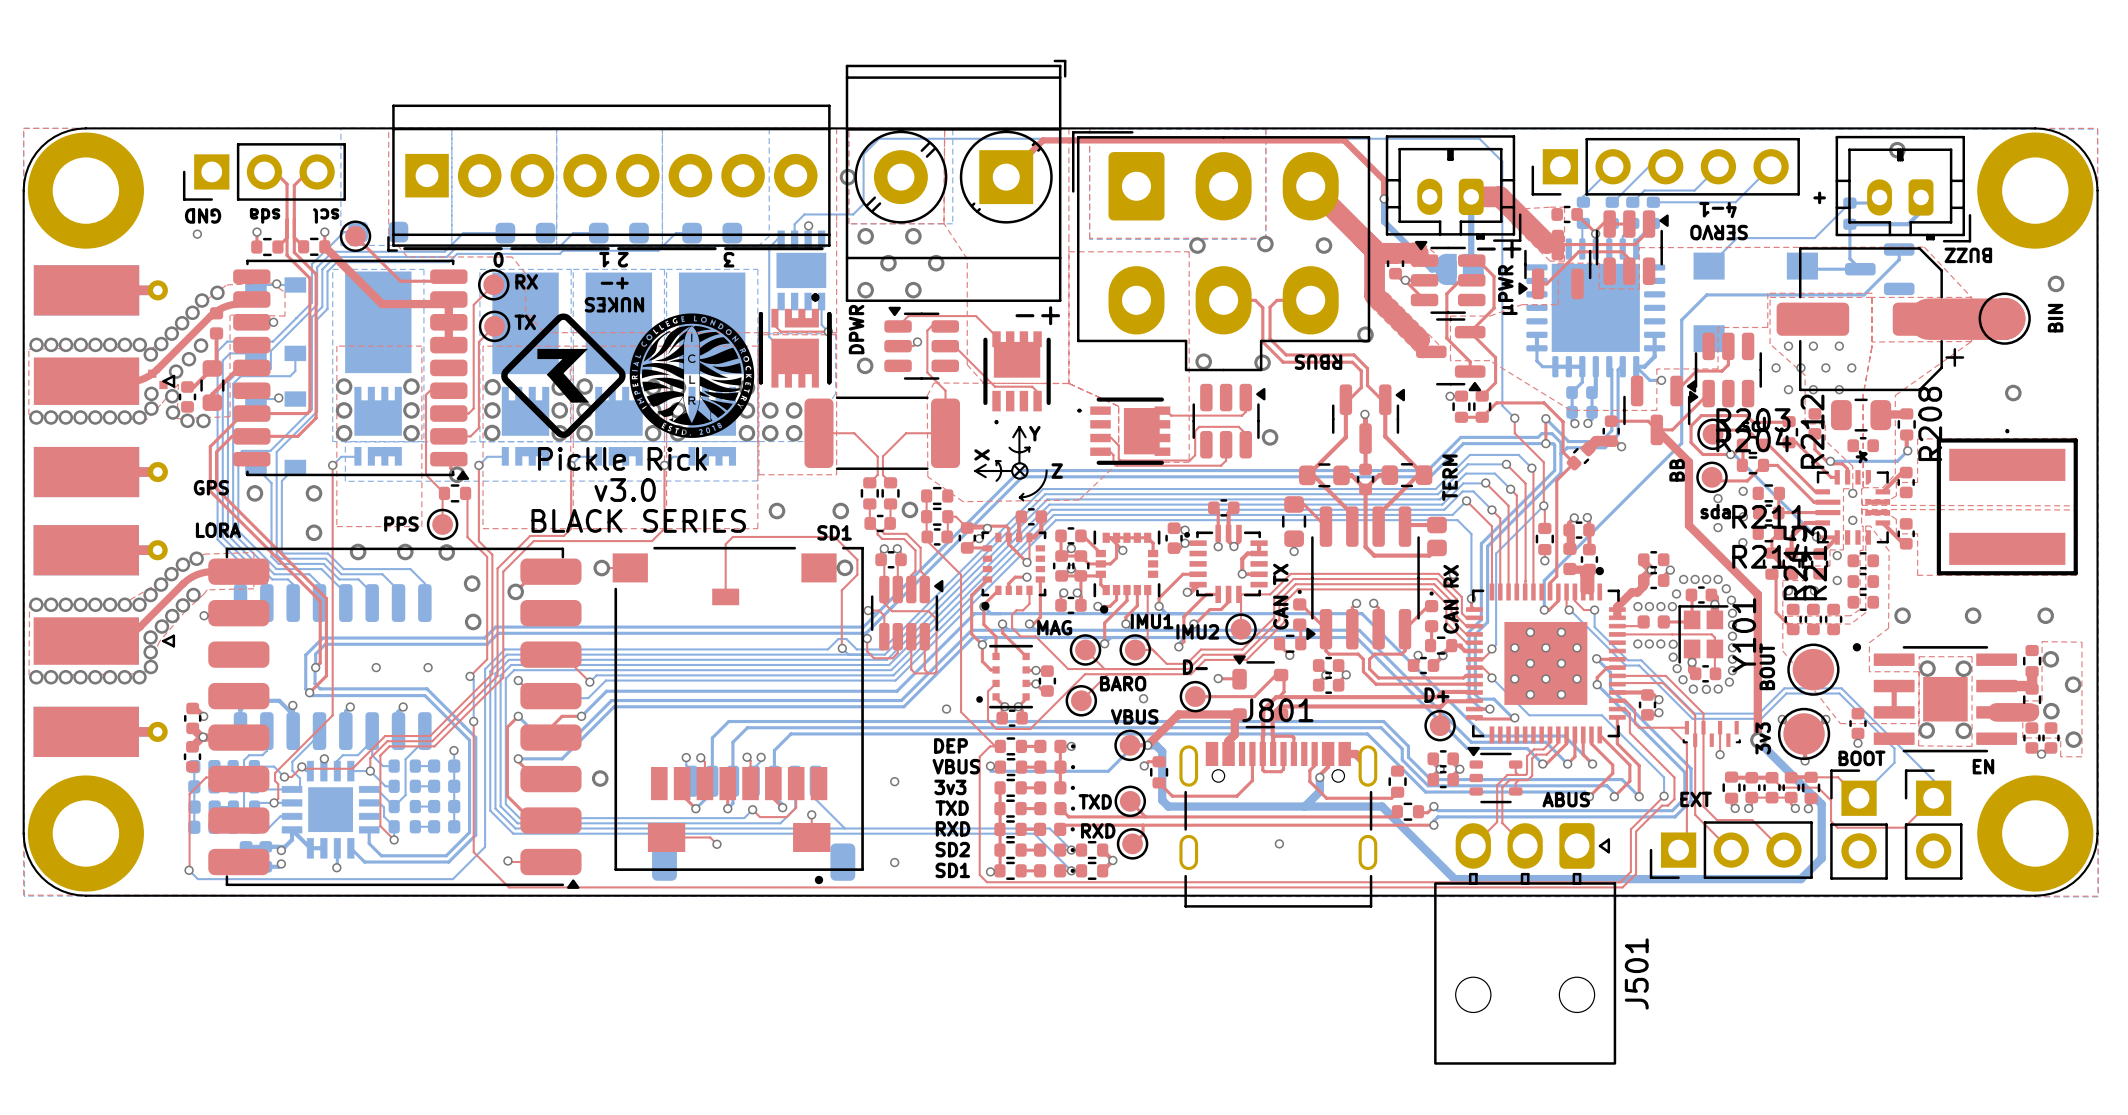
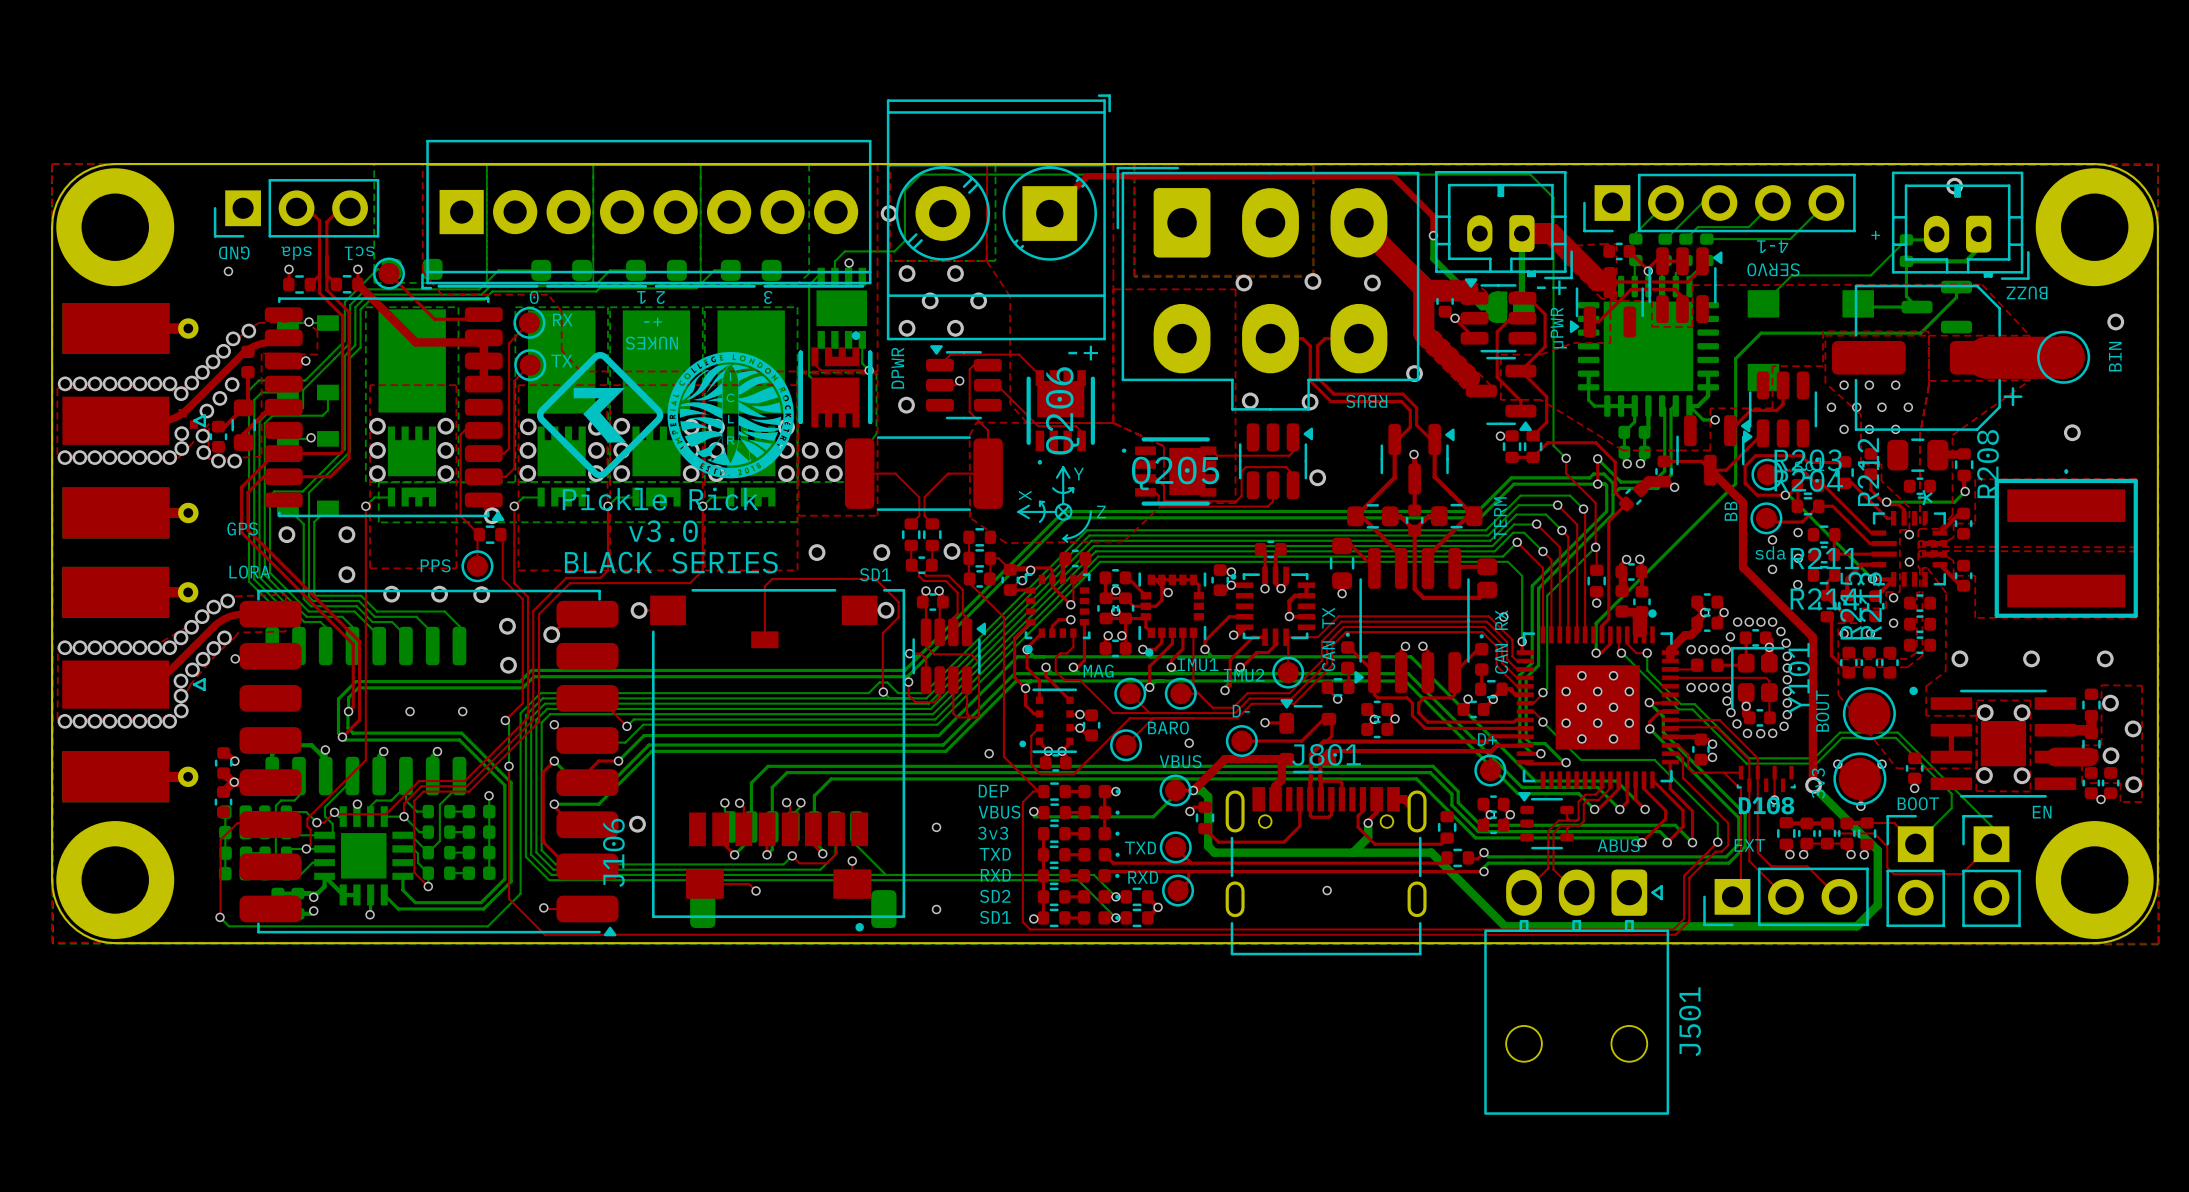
Q206 name: none -> Q206 (1062, 410)
Q205 name: none -> Q205 (1175, 473)
Y101 footprint: [1678, 605, 1729, 664] -> [1731, 646, 1785, 709]
D108 name: none -> D108 (1766, 805)
J106 name: none -> J106 (613, 852)

